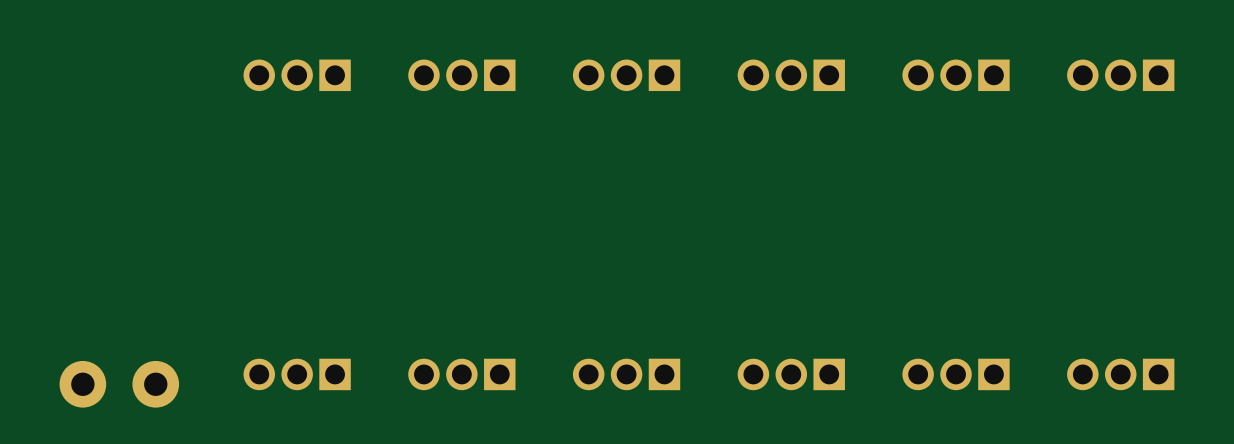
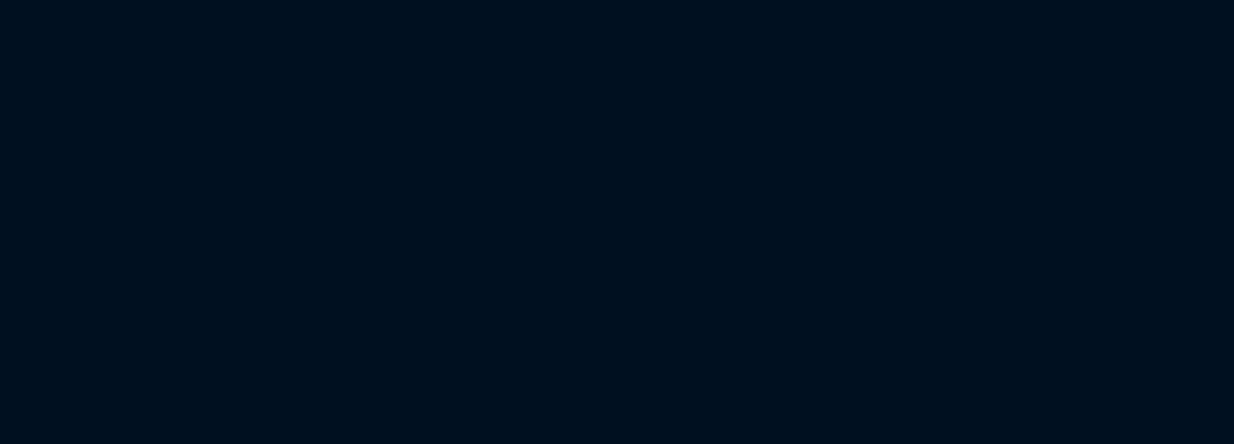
part: (297, 75) -> none
part: (461, 75) -> none
part: (626, 75) -> none
part: (791, 75) -> none
part: (956, 75) -> none
part: (1120, 75) -> none
part: (297, 374) -> none
part: (461, 374) -> none
part: (626, 374) -> none
part: (791, 374) -> none
part: (956, 374) -> none
part: (1120, 374) -> none
part: (119, 384) -> none

